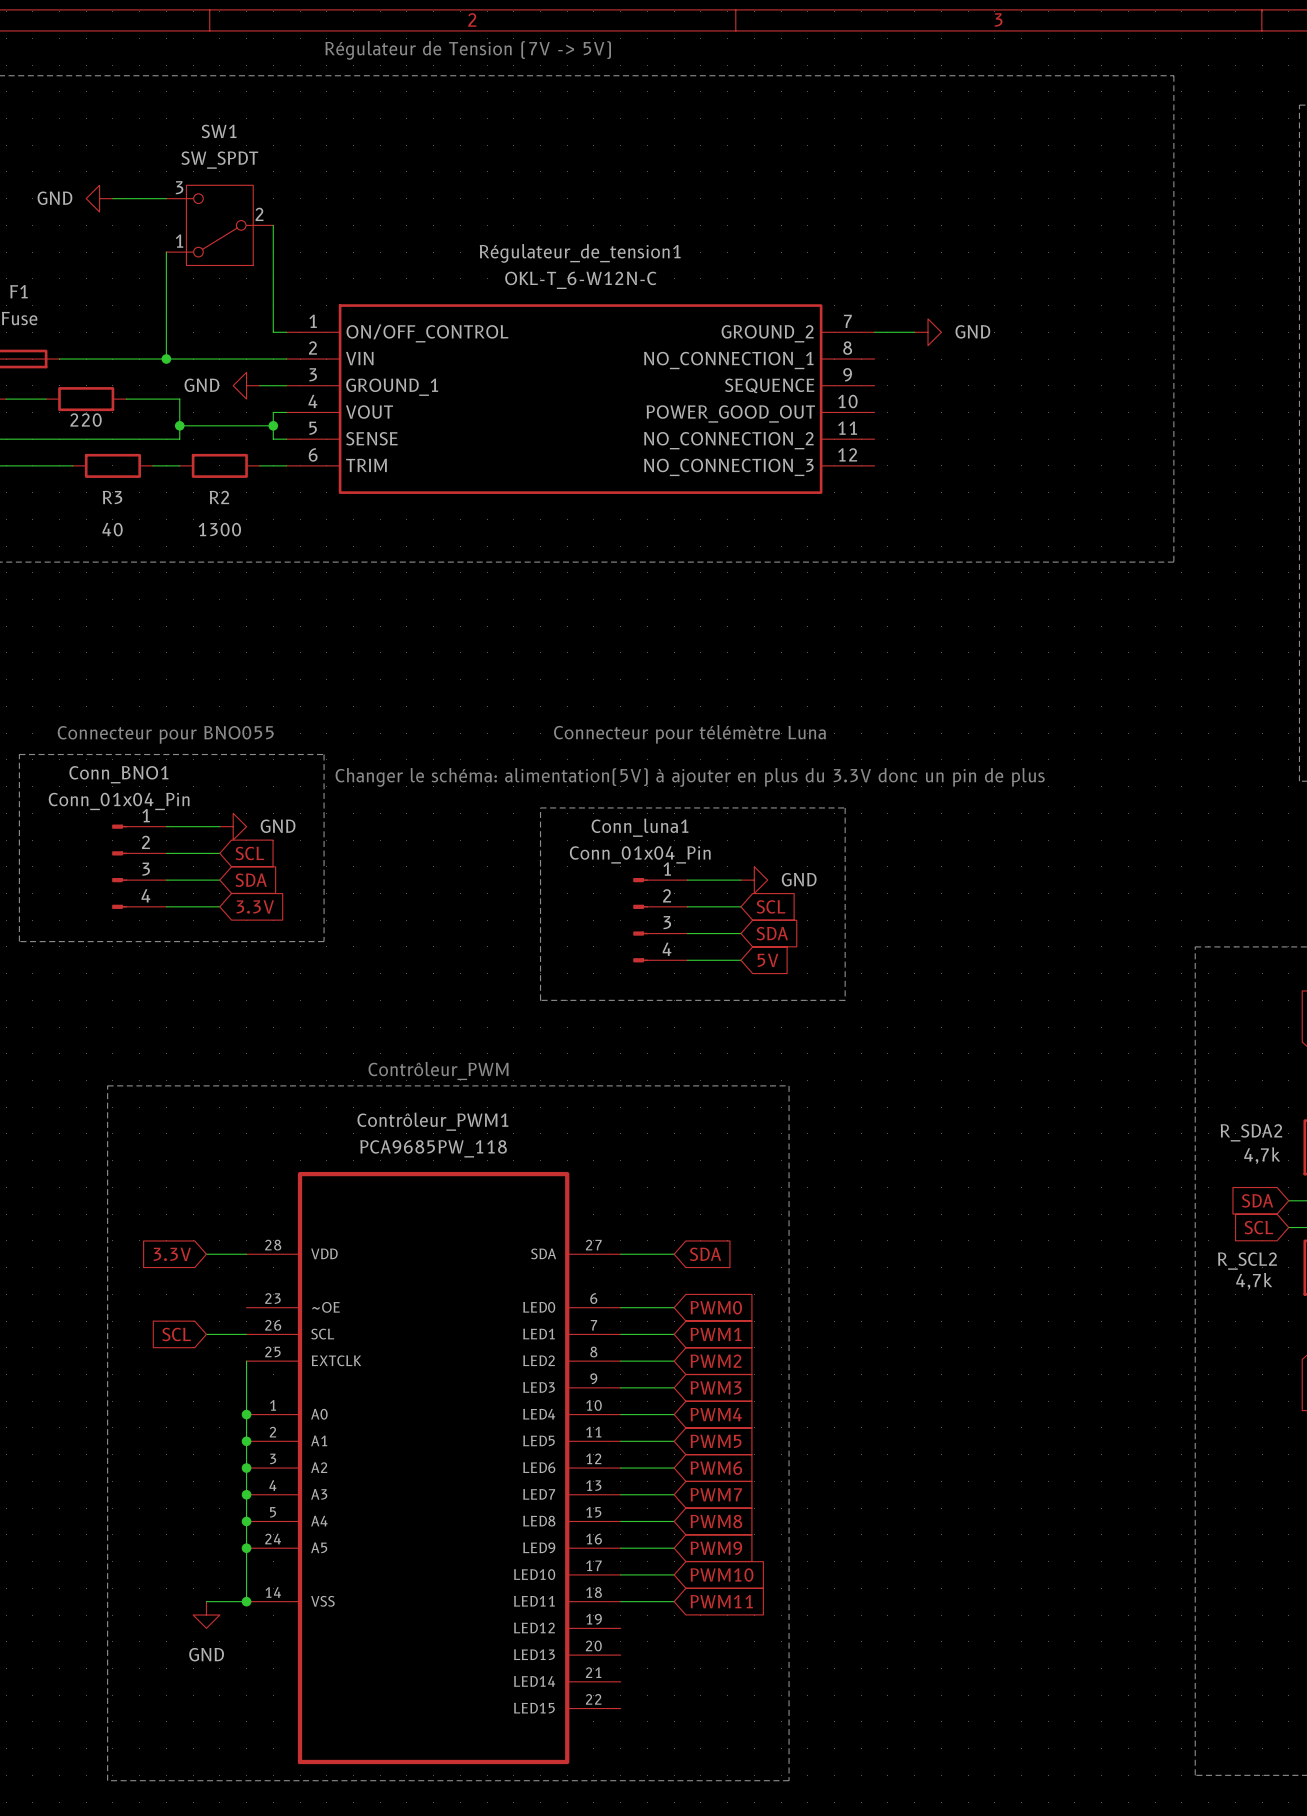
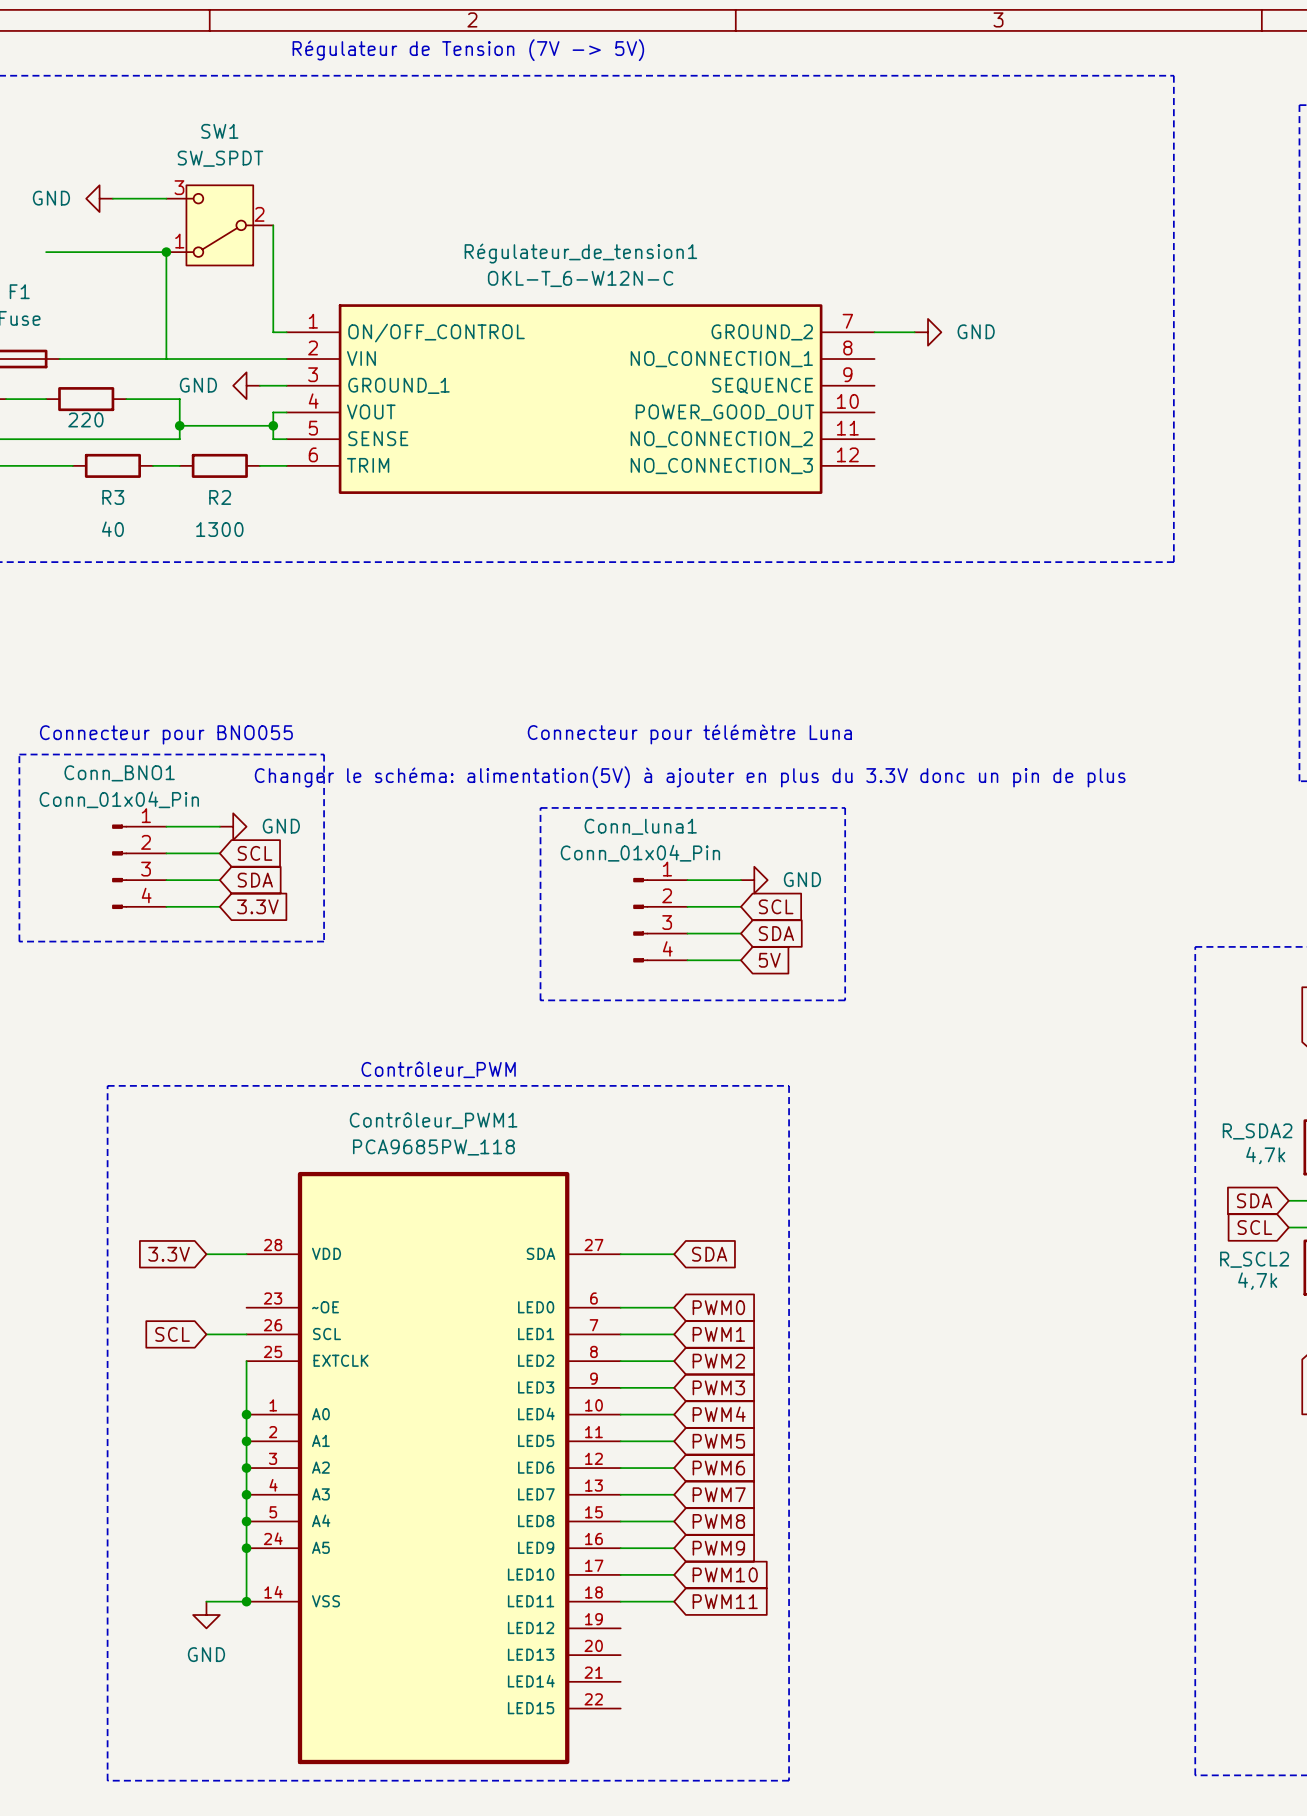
wire: none -> (46, 252) (166, 252)
junction: none -> (166, 252)
junction: (166, 359) -> none

